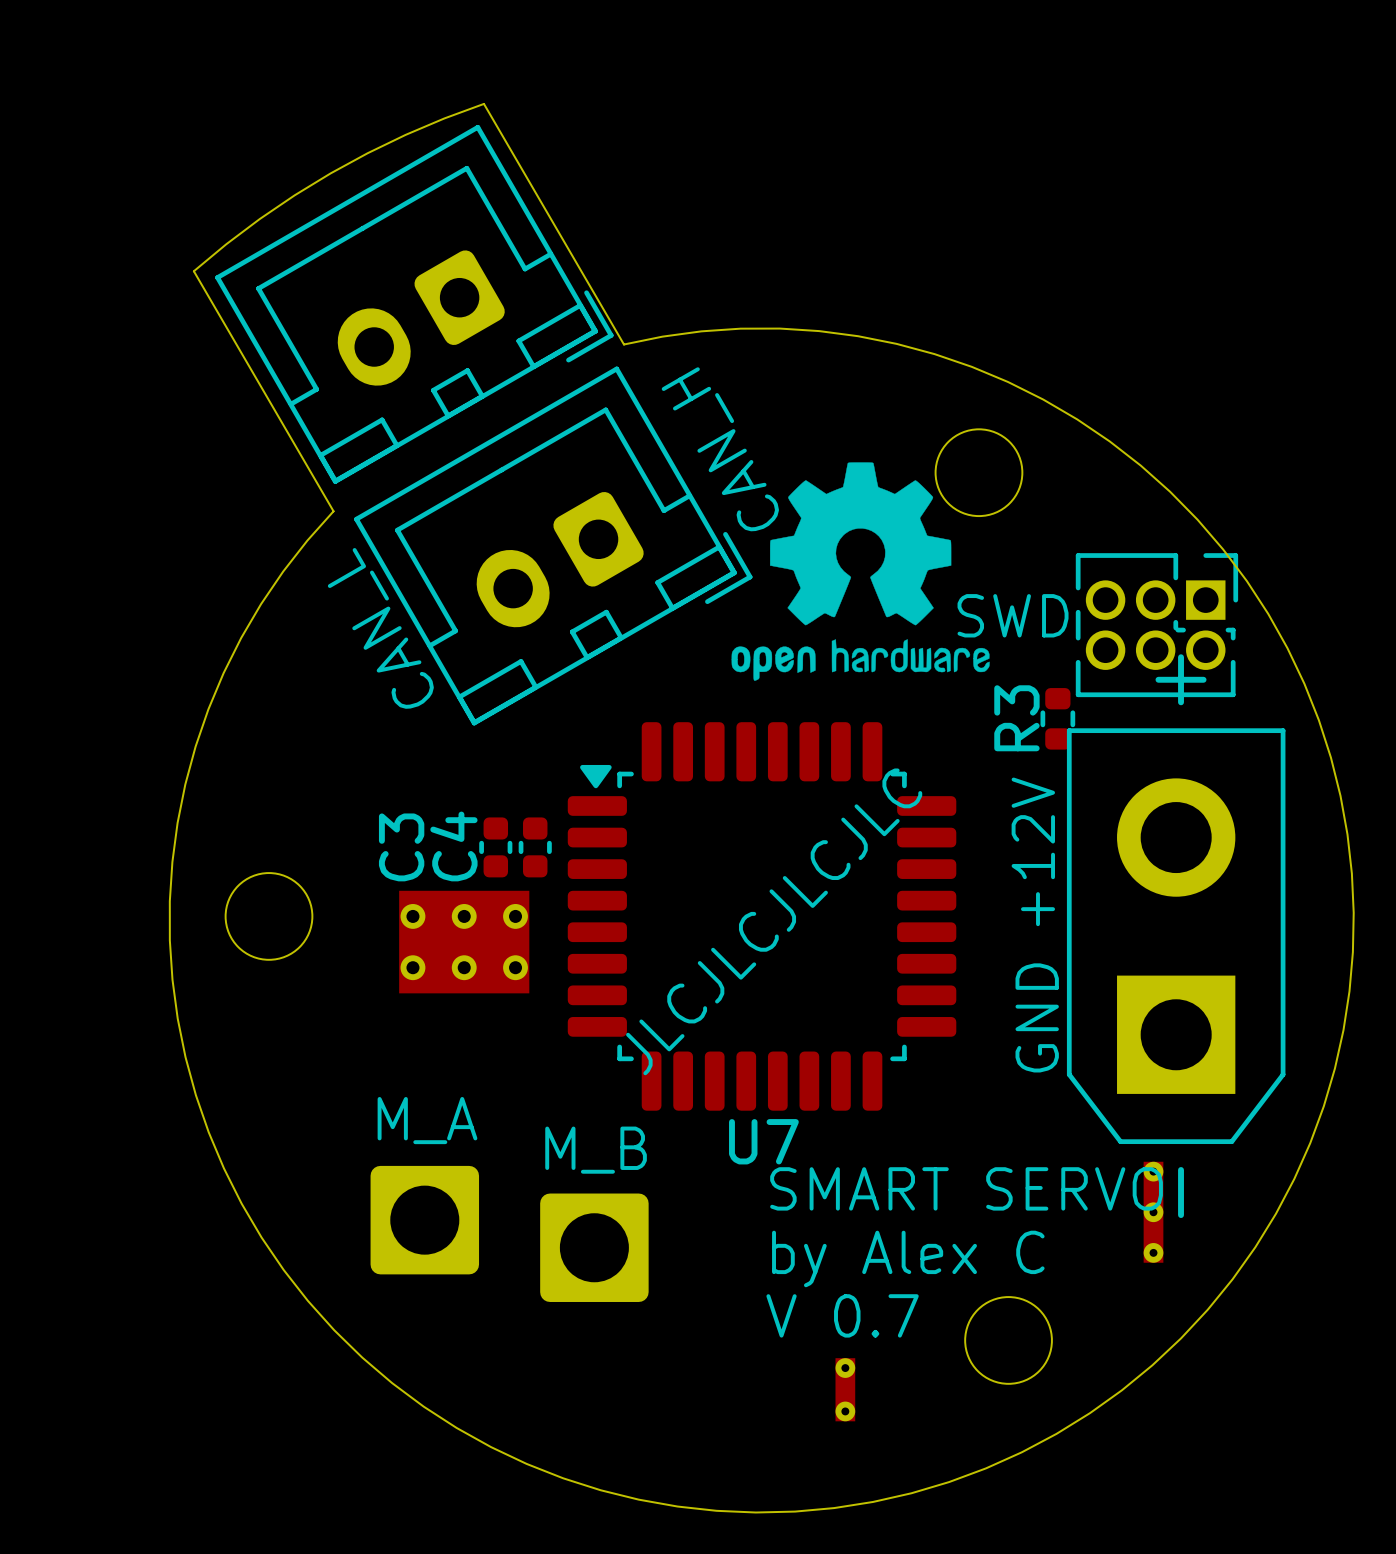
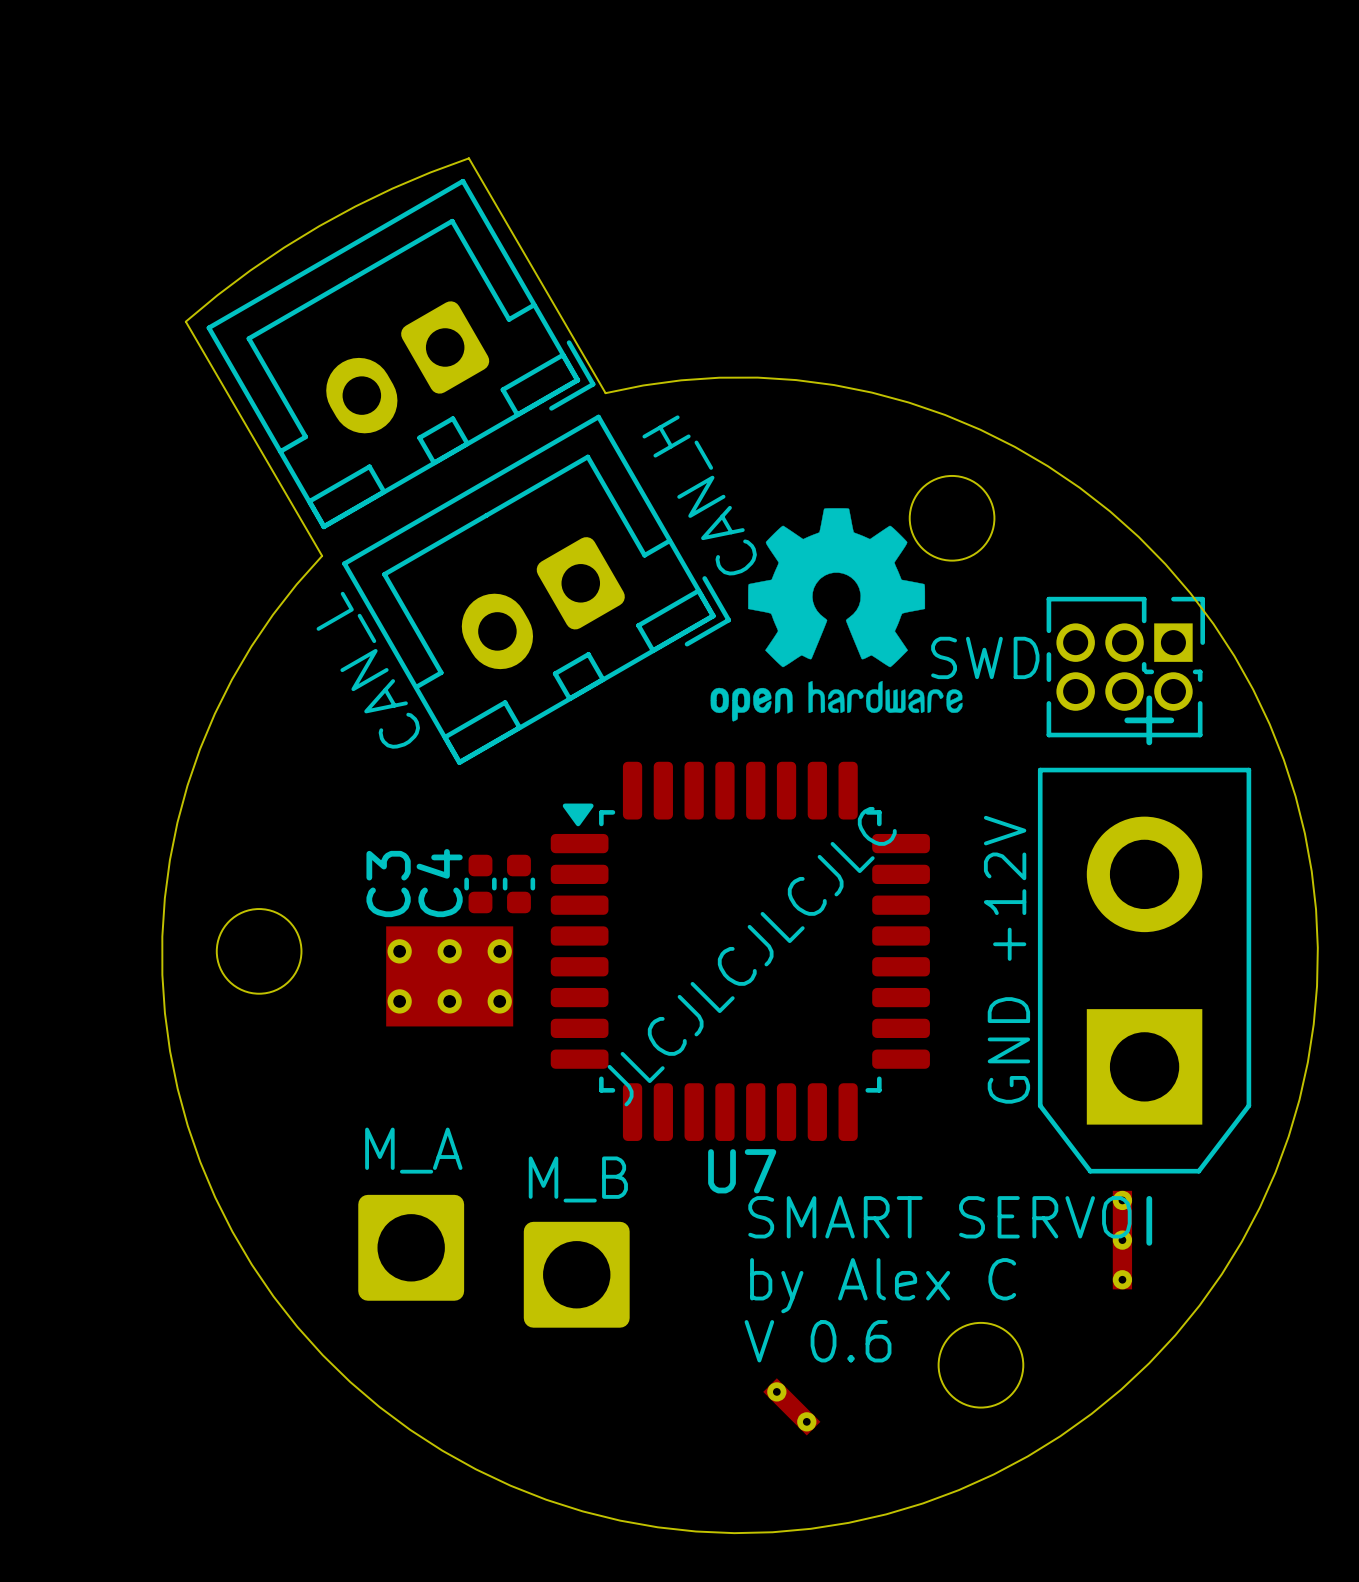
R3: (1057, 718) -> none
text: V 0.7 (842, 1315) -> V 0.6 (818, 1341)
part rotation: 0° (845, 1389) -> 45° counterclockwise (791, 1406)

